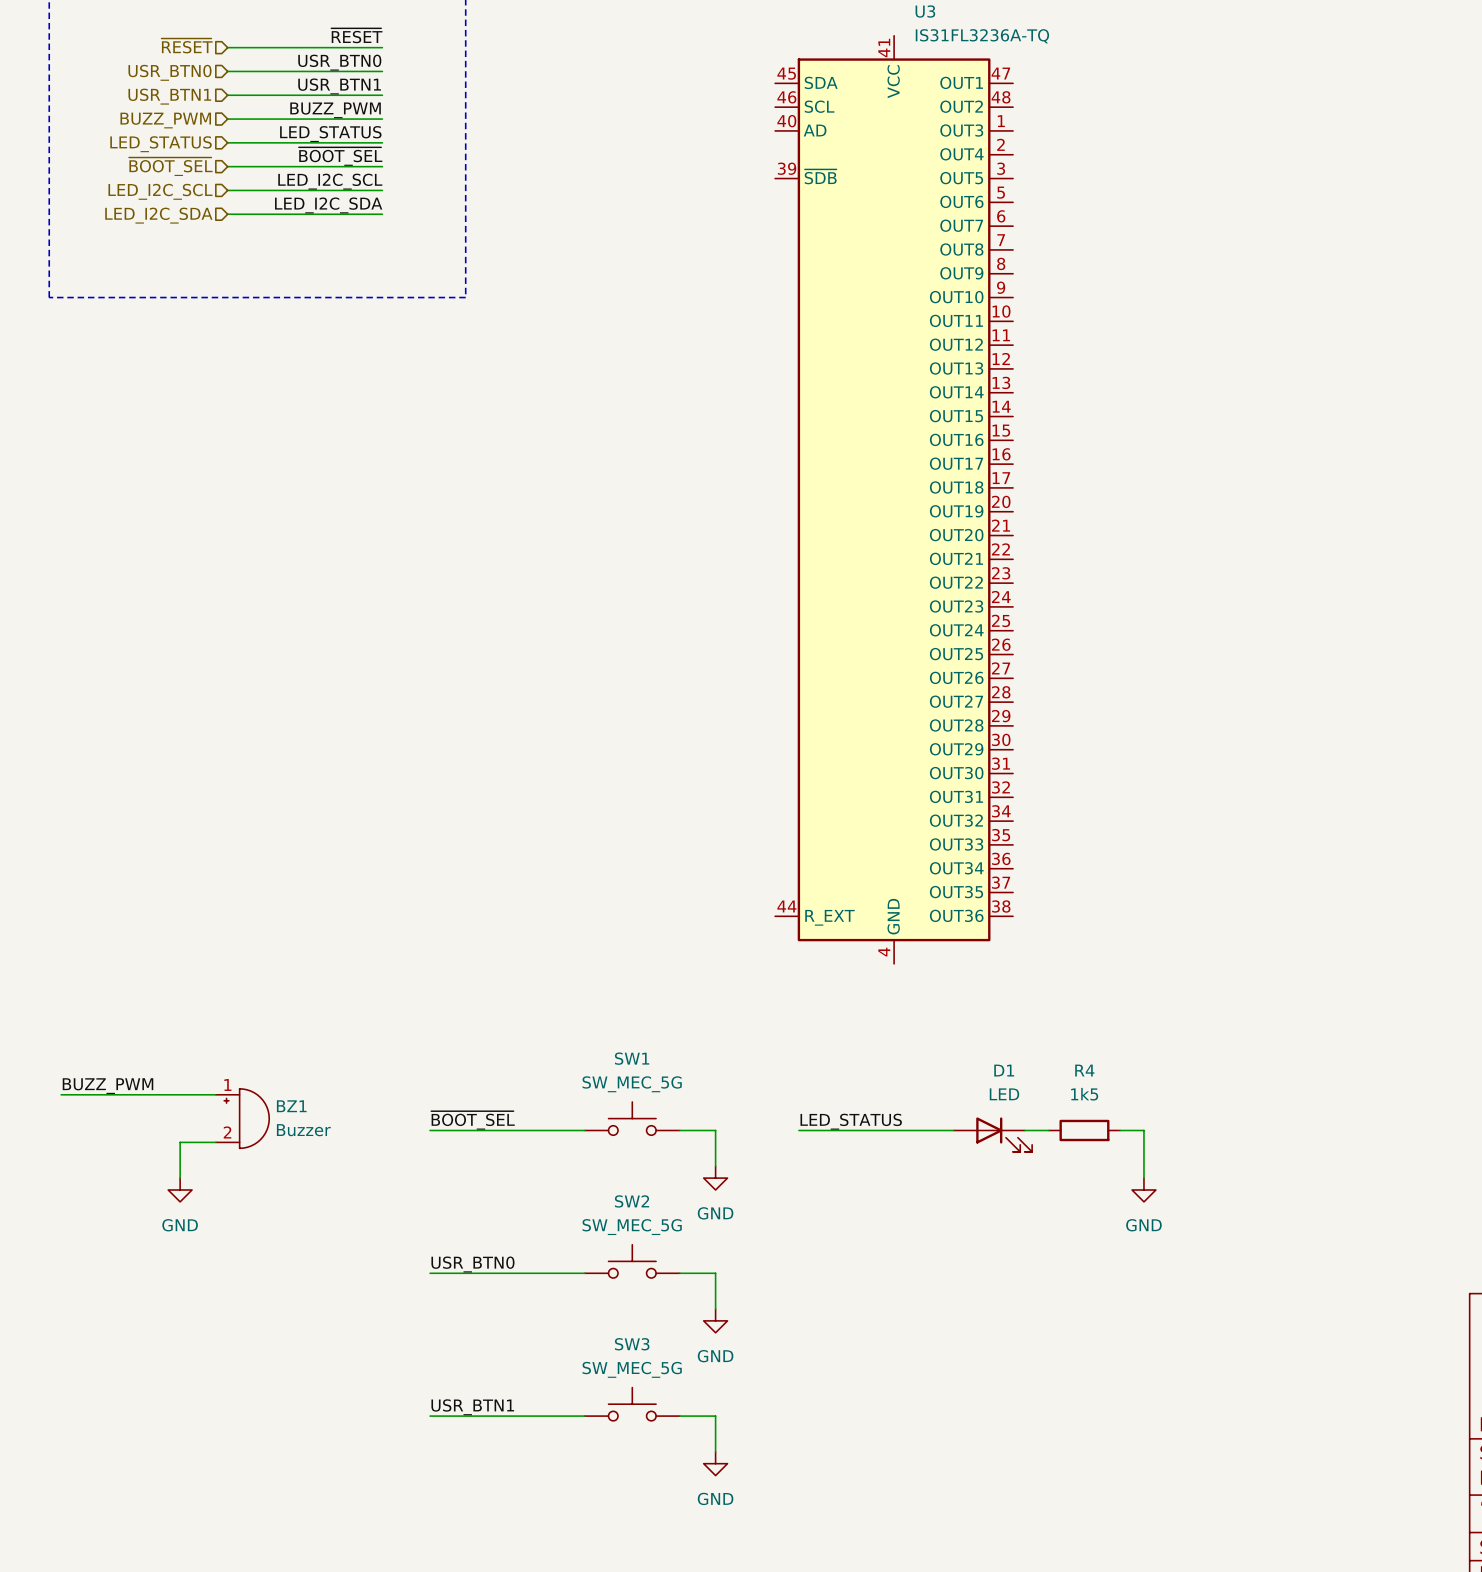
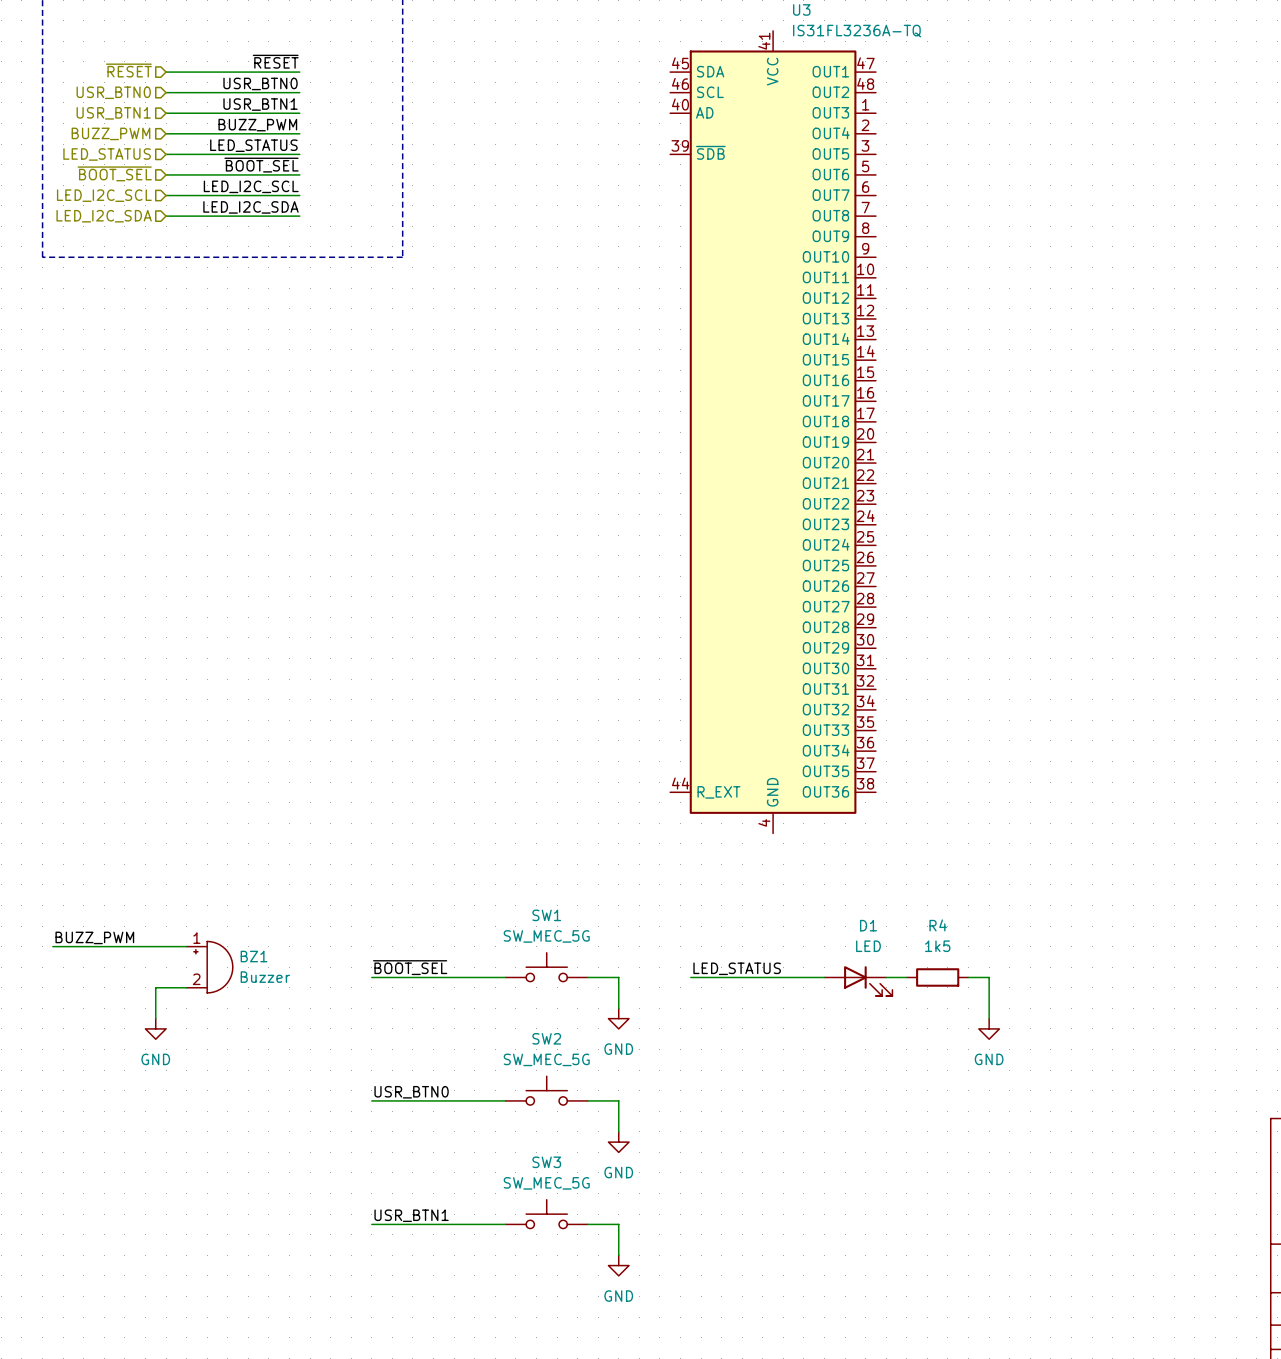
label position: ~{RESET} (356, 35) -> ~{RESET} (275, 61)
hierarchical label position: ~{RESET} (187, 45) -> ~{RESET} (128, 70)
wire: (227, 47) (382, 47) -> (166, 72) (299, 72)
label position: USR_BTN0 (339, 62) -> USR_BTN0 (260, 83)
wire: (227, 71) (382, 71) -> (166, 92) (299, 92)
hierarchical label position: USR_BTN0 (169, 72) -> USR_BTN0 (113, 92)
label position: USR_BTN1 (339, 86) -> USR_BTN1 (260, 104)
wire: (227, 95) (382, 95) -> (166, 113) (299, 113)
hierarchical label position: USR_BTN1 (169, 96) -> USR_BTN1 (113, 113)
label position: BUZZ_PWM (335, 110) -> BUZZ_PWM (257, 125)
wire: (227, 119) (382, 119) -> (166, 133) (299, 133)
hierarchical label position: BUZZ_PWM (165, 120) -> BUZZ_PWM (111, 133)
label position: LED_STATUS (330, 134) -> LED_STATUS (253, 145)
wire: (227, 142) (382, 142) -> (166, 154) (299, 154)
hierarchical label position: LED_STATUS (161, 144) -> LED_STATUS (107, 154)
label position: ~{BOOT_SEL} (340, 156) -> ~{BOOT_SEL} (261, 165)
hierarchical label position: ~{BOOT_SEL} (170, 166) -> ~{BOOT_SEL} (114, 173)
wire: (227, 166) (382, 166) -> (166, 174) (299, 174)
label position: LED_I2C_SCL (330, 181) -> LED_I2C_SCL (251, 186)
wire: (227, 190) (382, 190) -> (166, 195) (299, 195)
hierarchical label position: LED_I2C_SCL (160, 191) -> LED_I2C_SCL (104, 195)
label position: LED_I2C_SDA (328, 205) -> LED_I2C_SDA (250, 207)
wire: (227, 214) (382, 214) -> (166, 216) (299, 216)
hierarchical label position: LED_I2C_SDA (158, 215) -> LED_I2C_SDA (104, 216)

